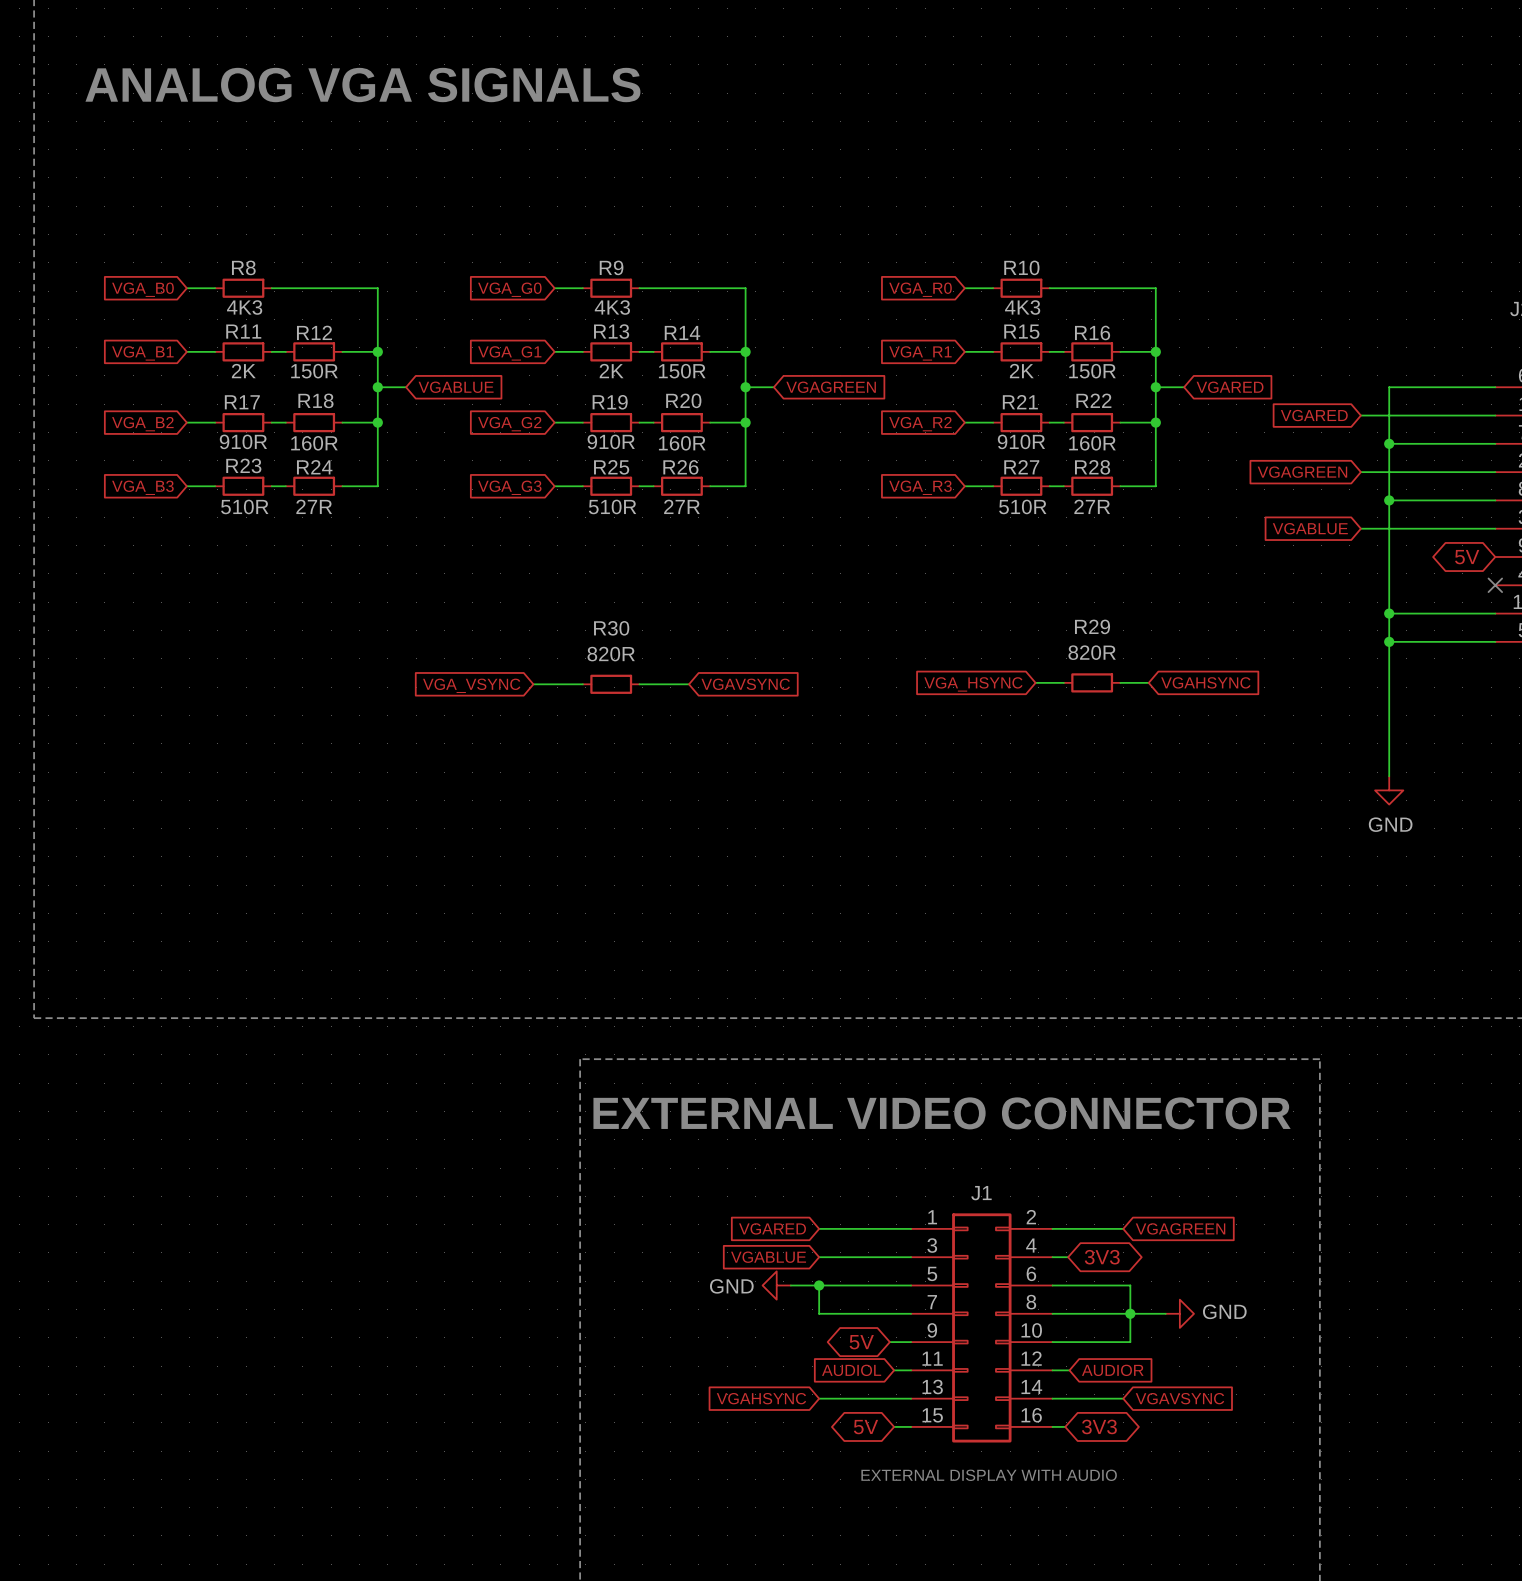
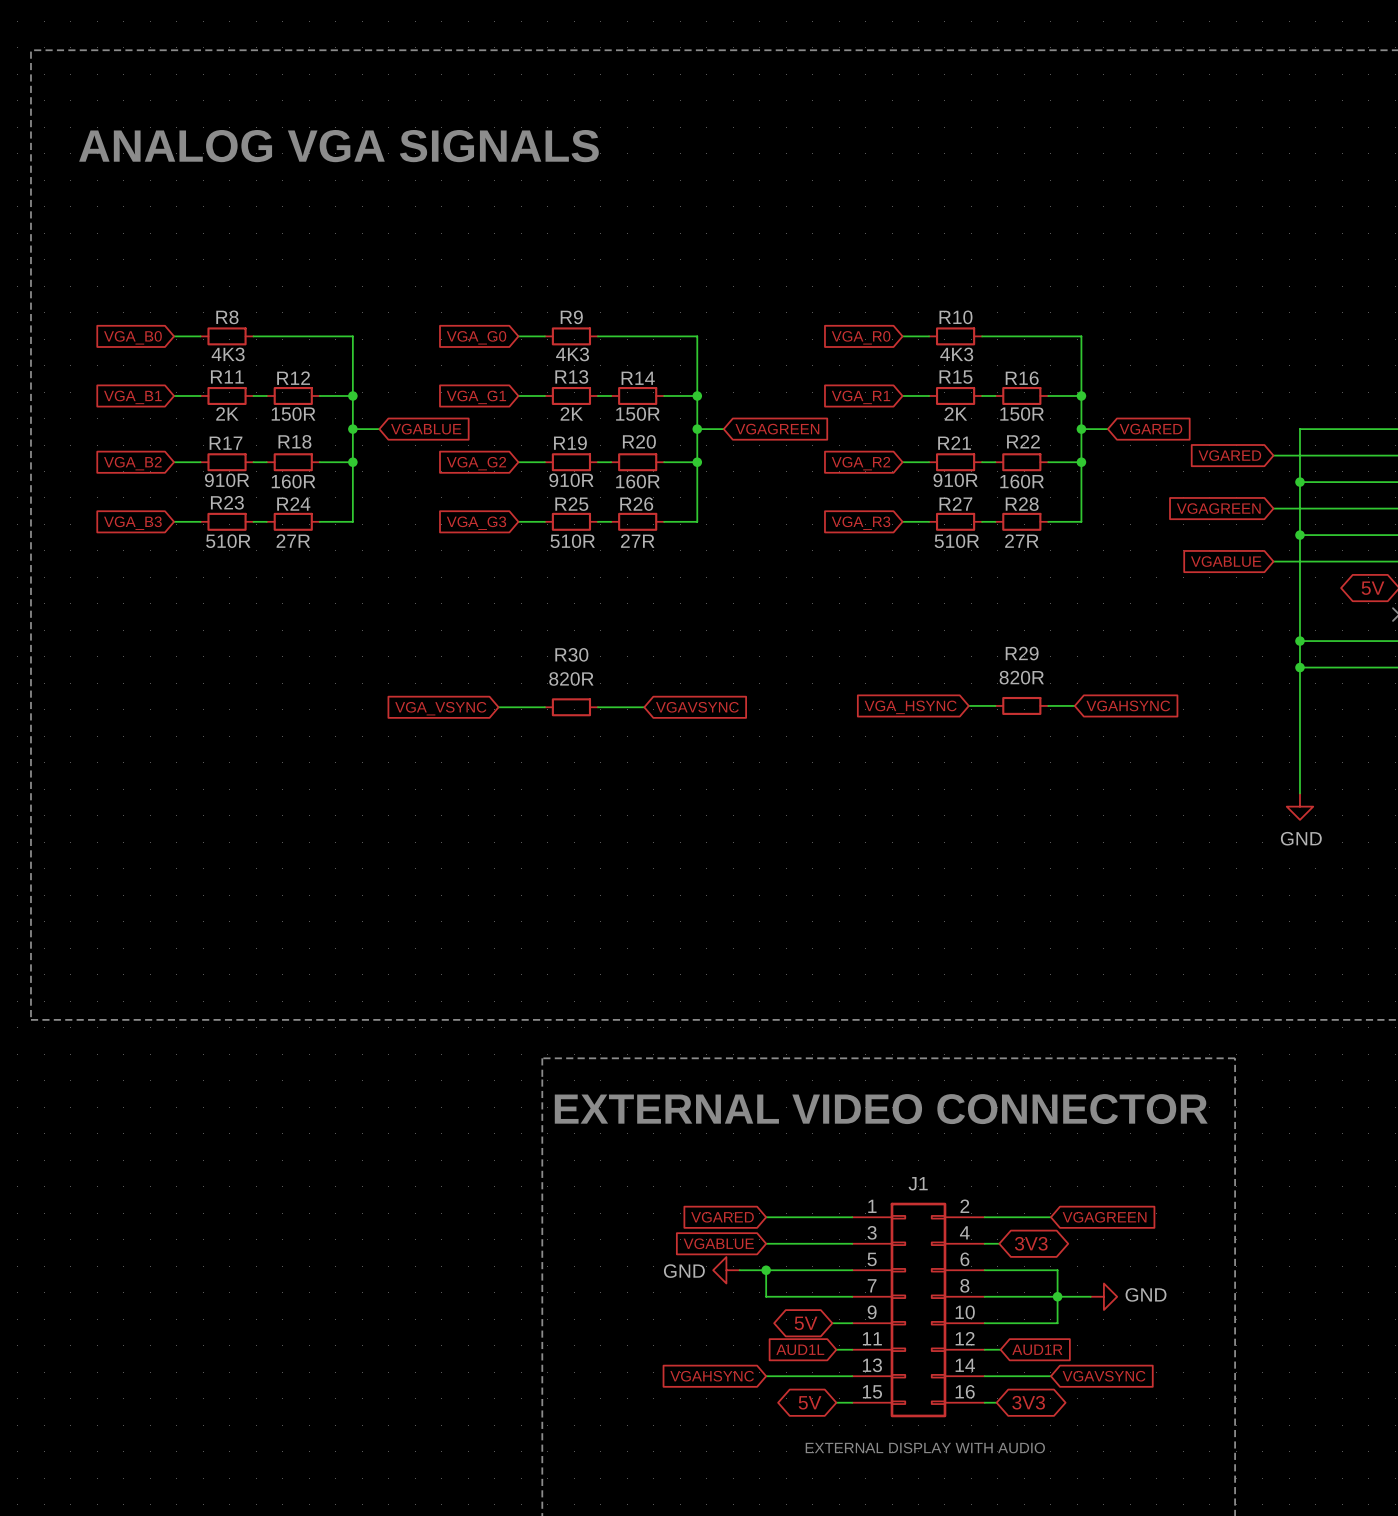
global label: AUDIOL (851, 1370) -> AUD1L (800, 1349)
global label: AUDIOR (1112, 1370) -> AUD1R (1037, 1349)

